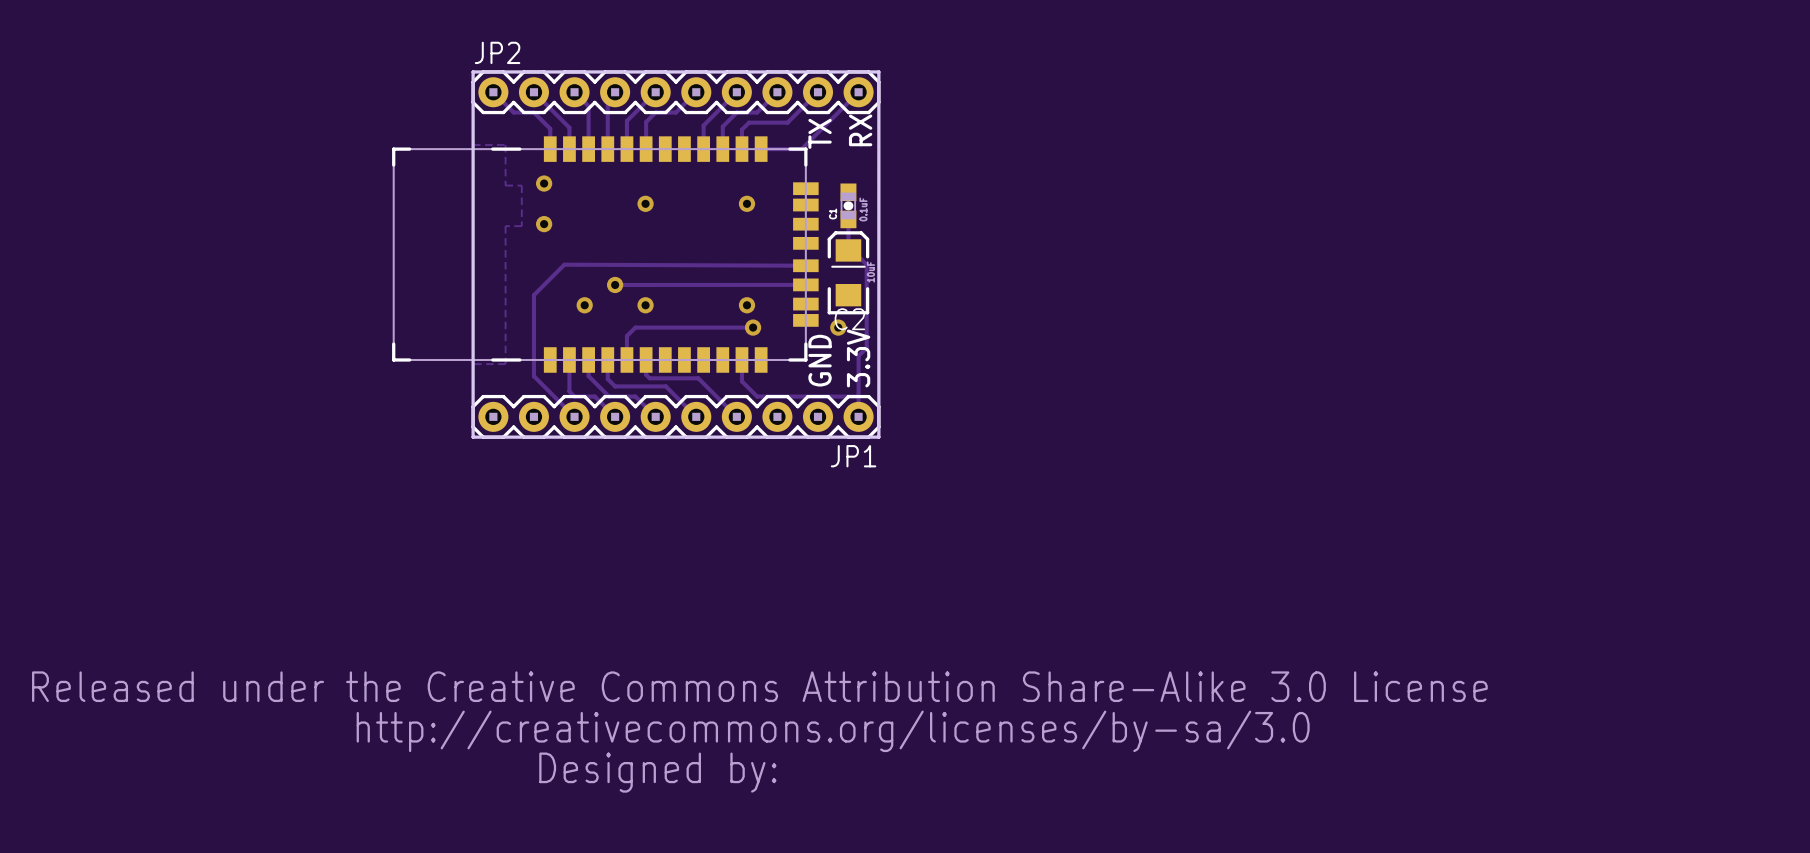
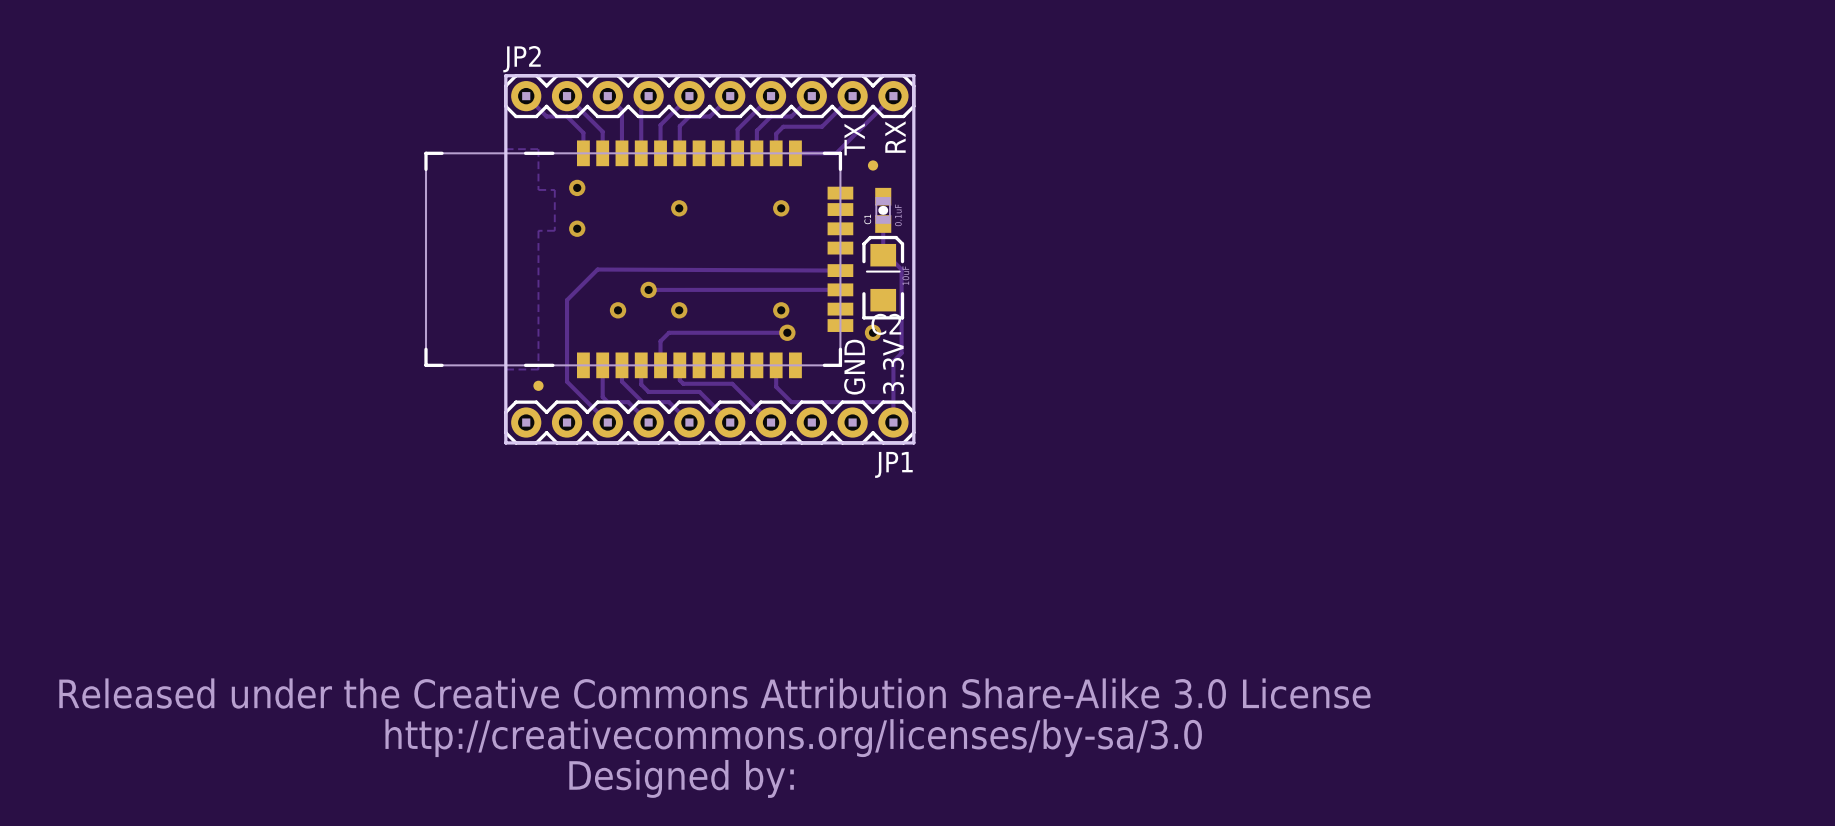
part: none -> (873, 165)
part: none -> (538, 385)

